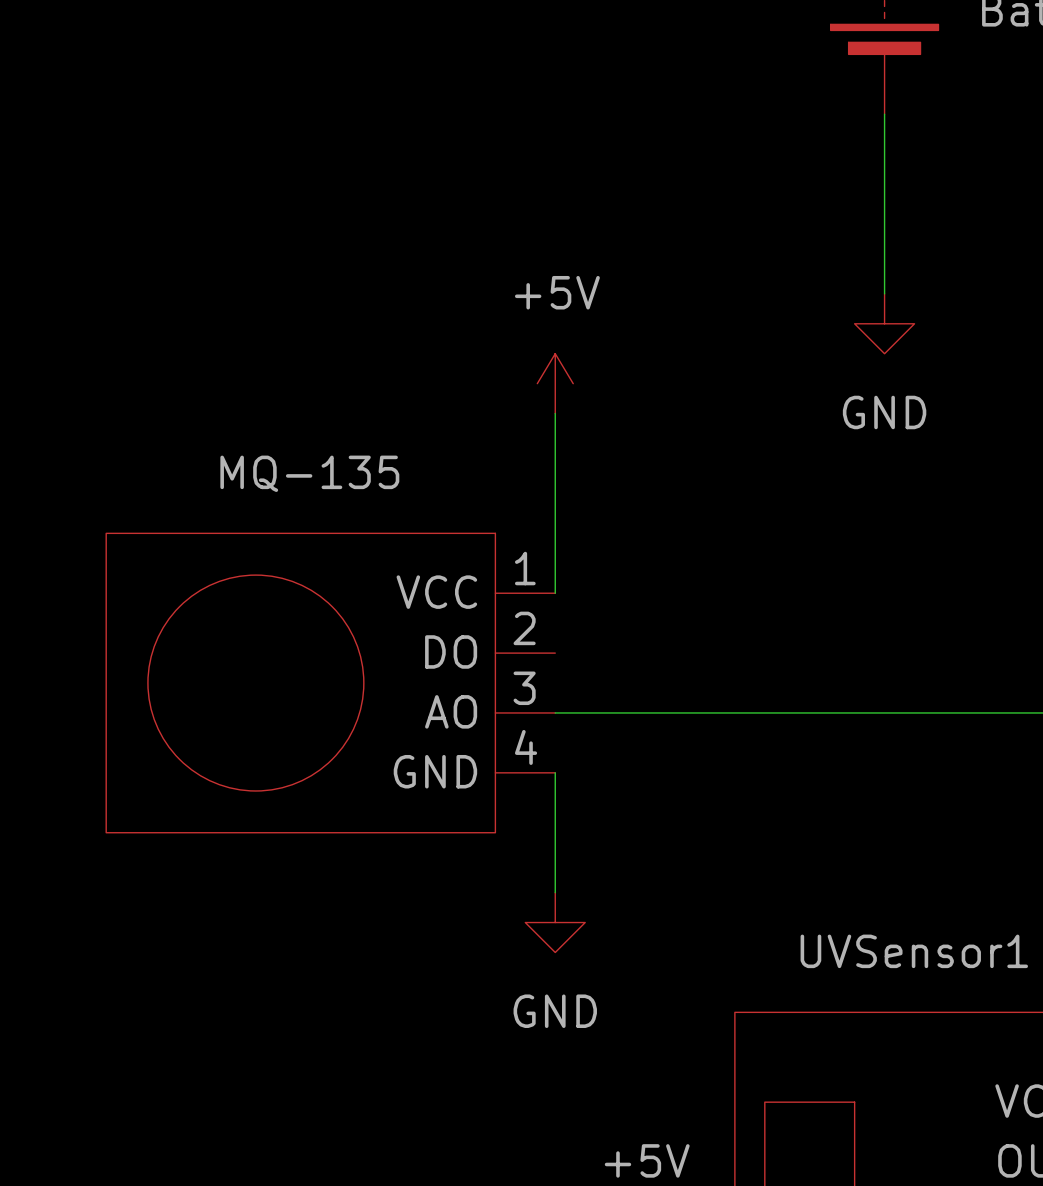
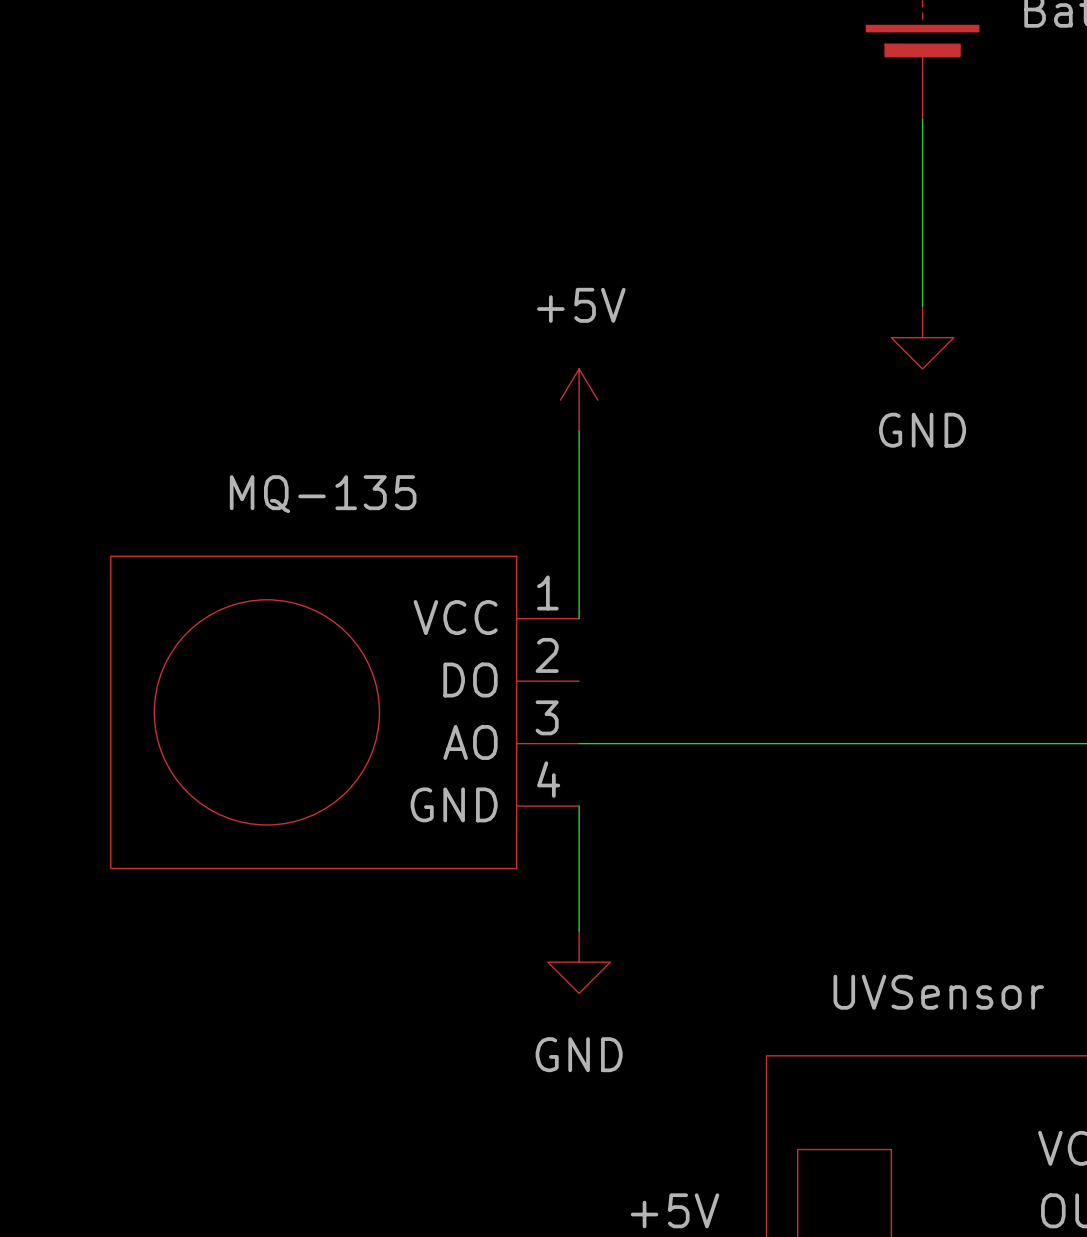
UVSensor1 name: UVSensor1 (914, 951) -> UVSensor (938, 992)

